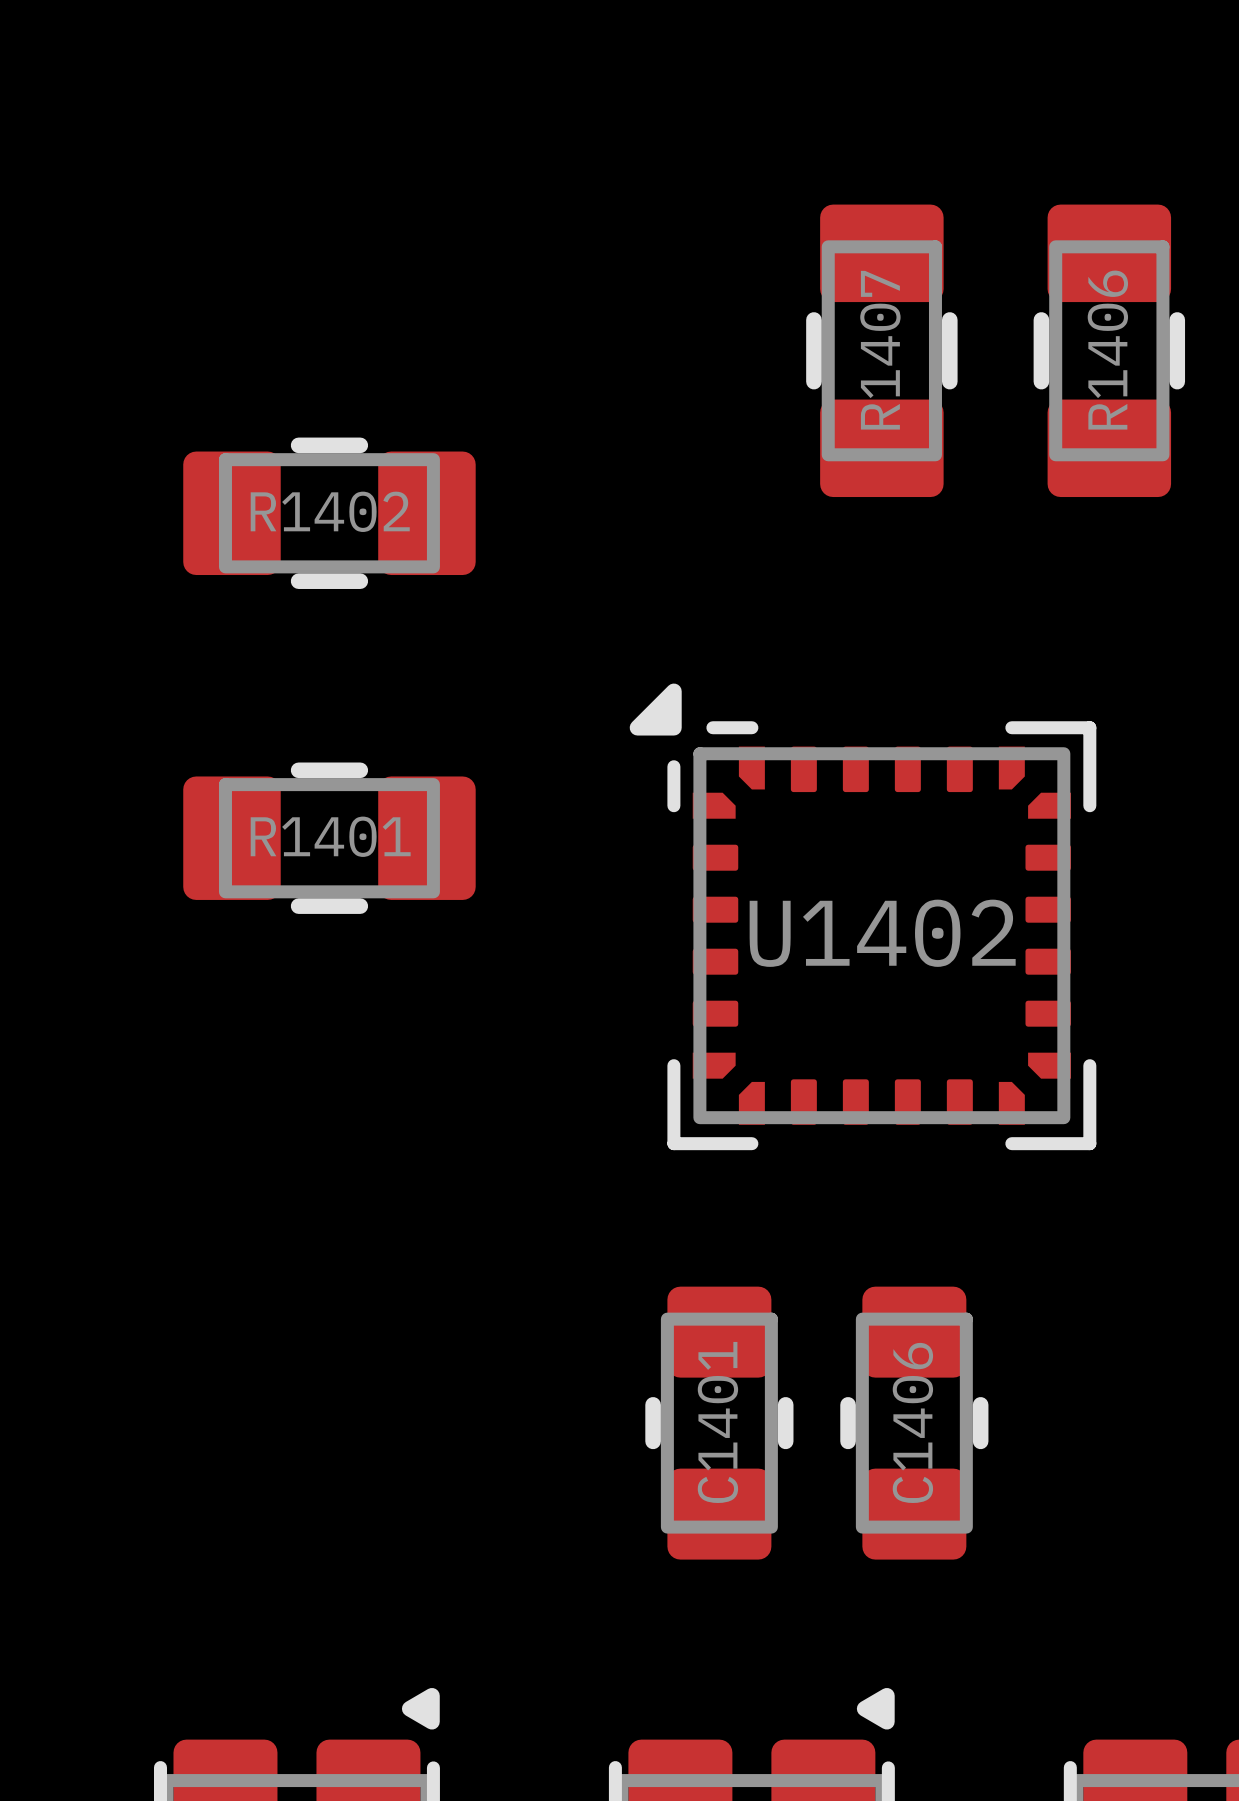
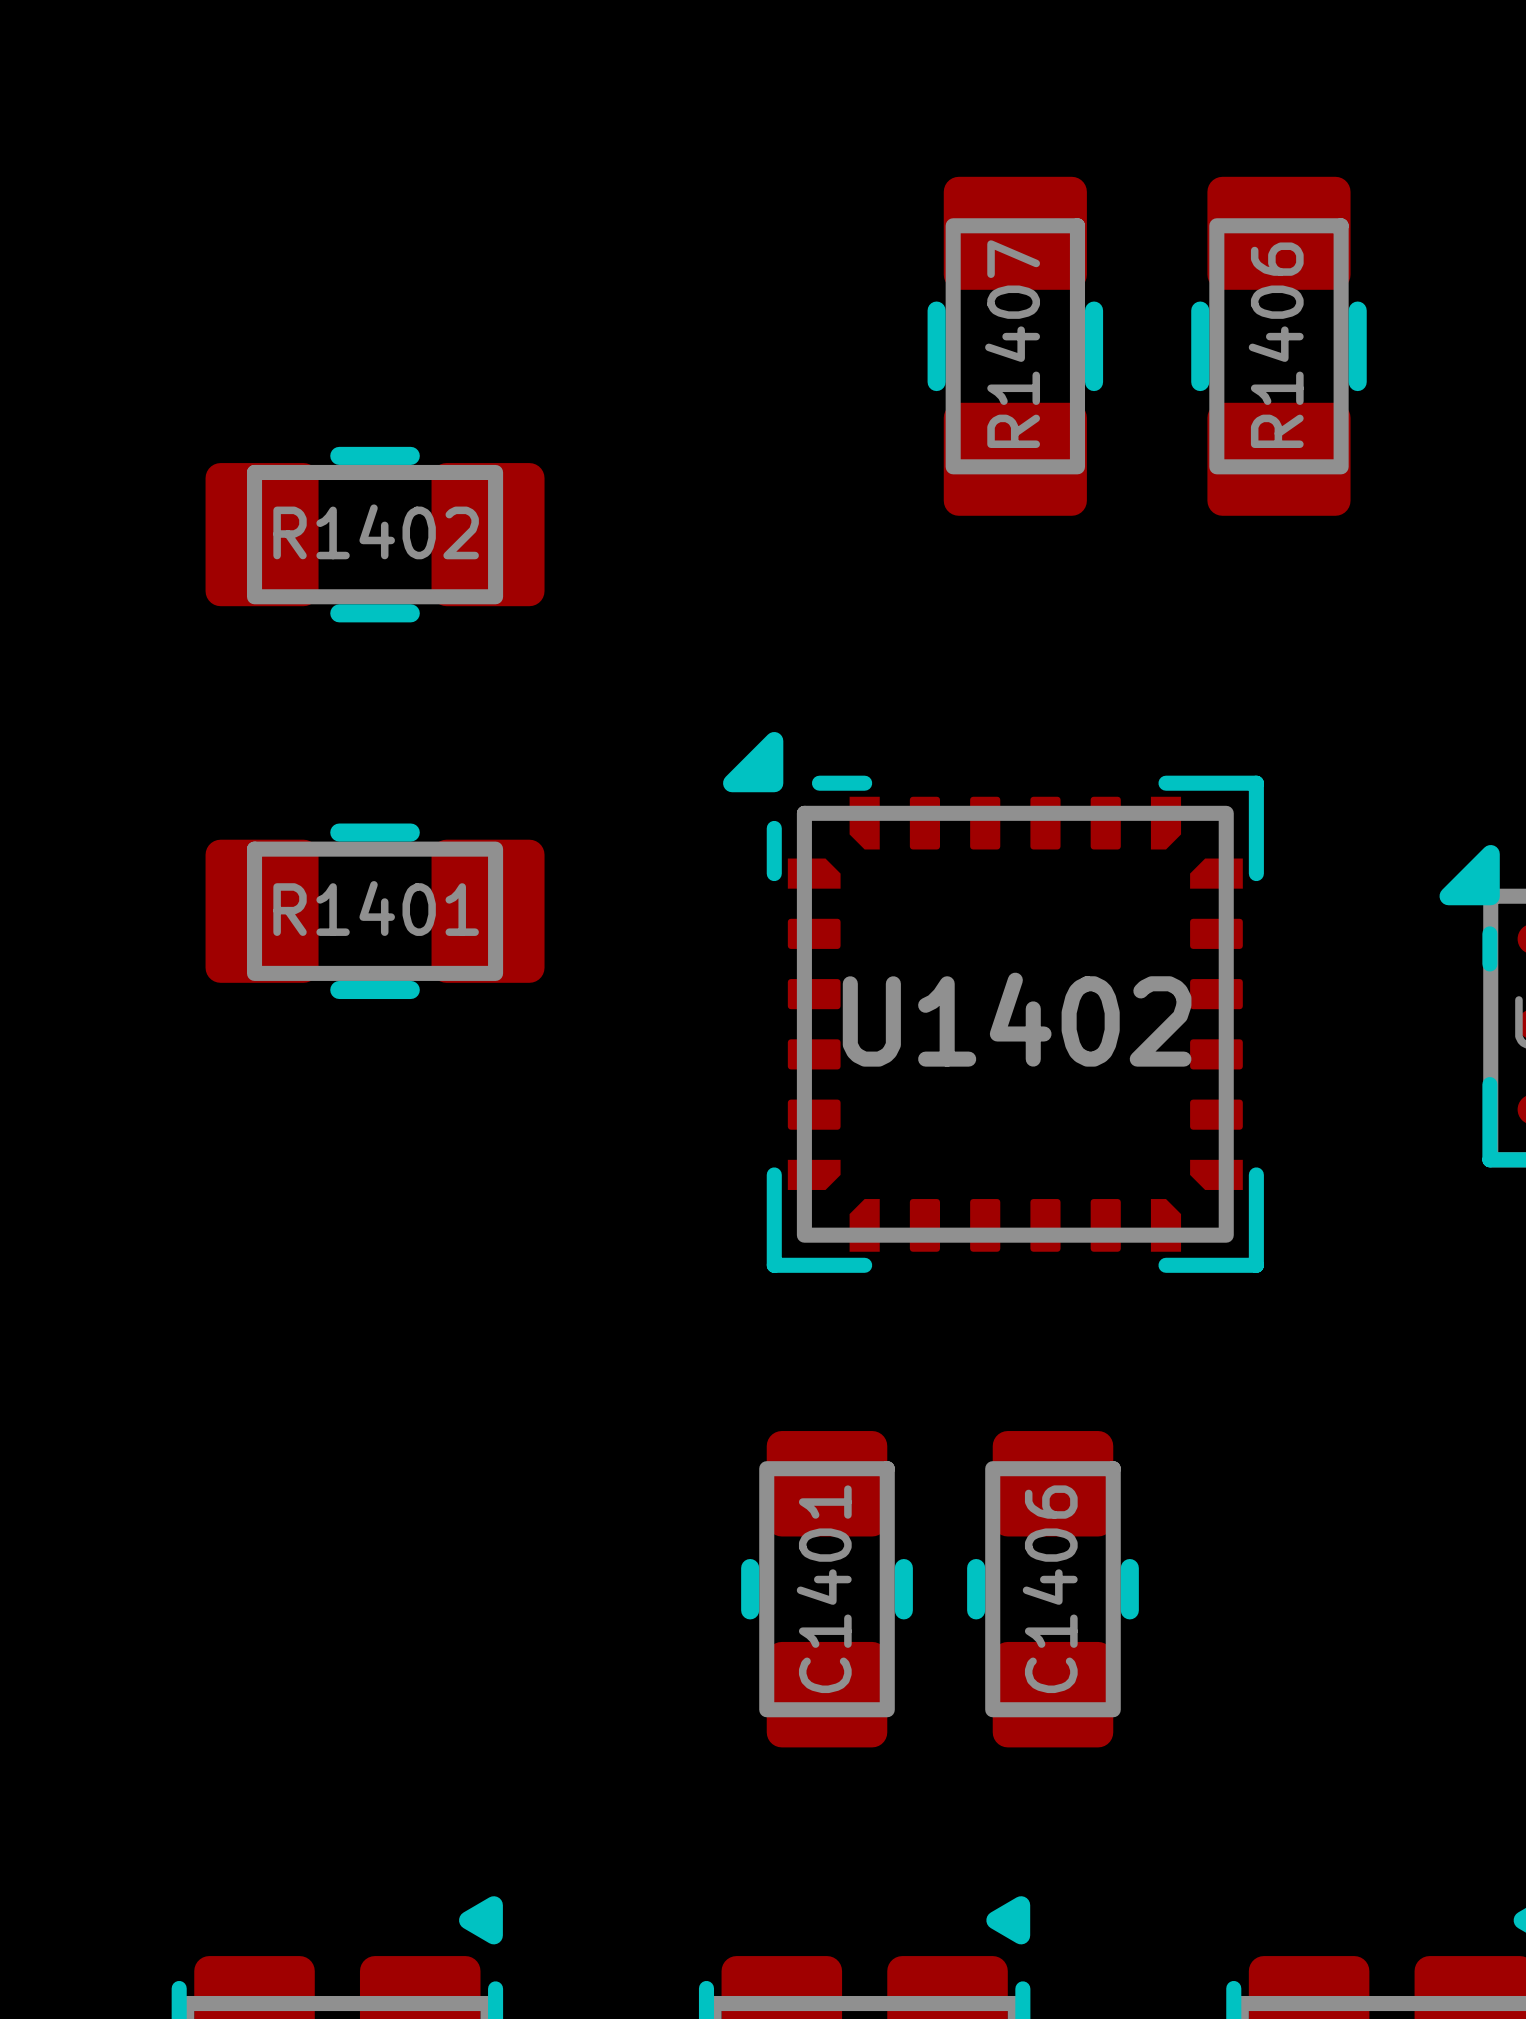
U1402 footprint: [629, 683, 1097, 1151] -> [723, 731, 1264, 1273]

